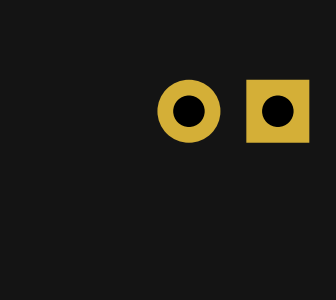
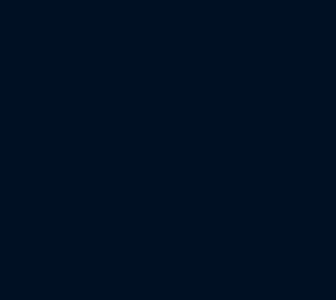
part: (233, 111) -> none

